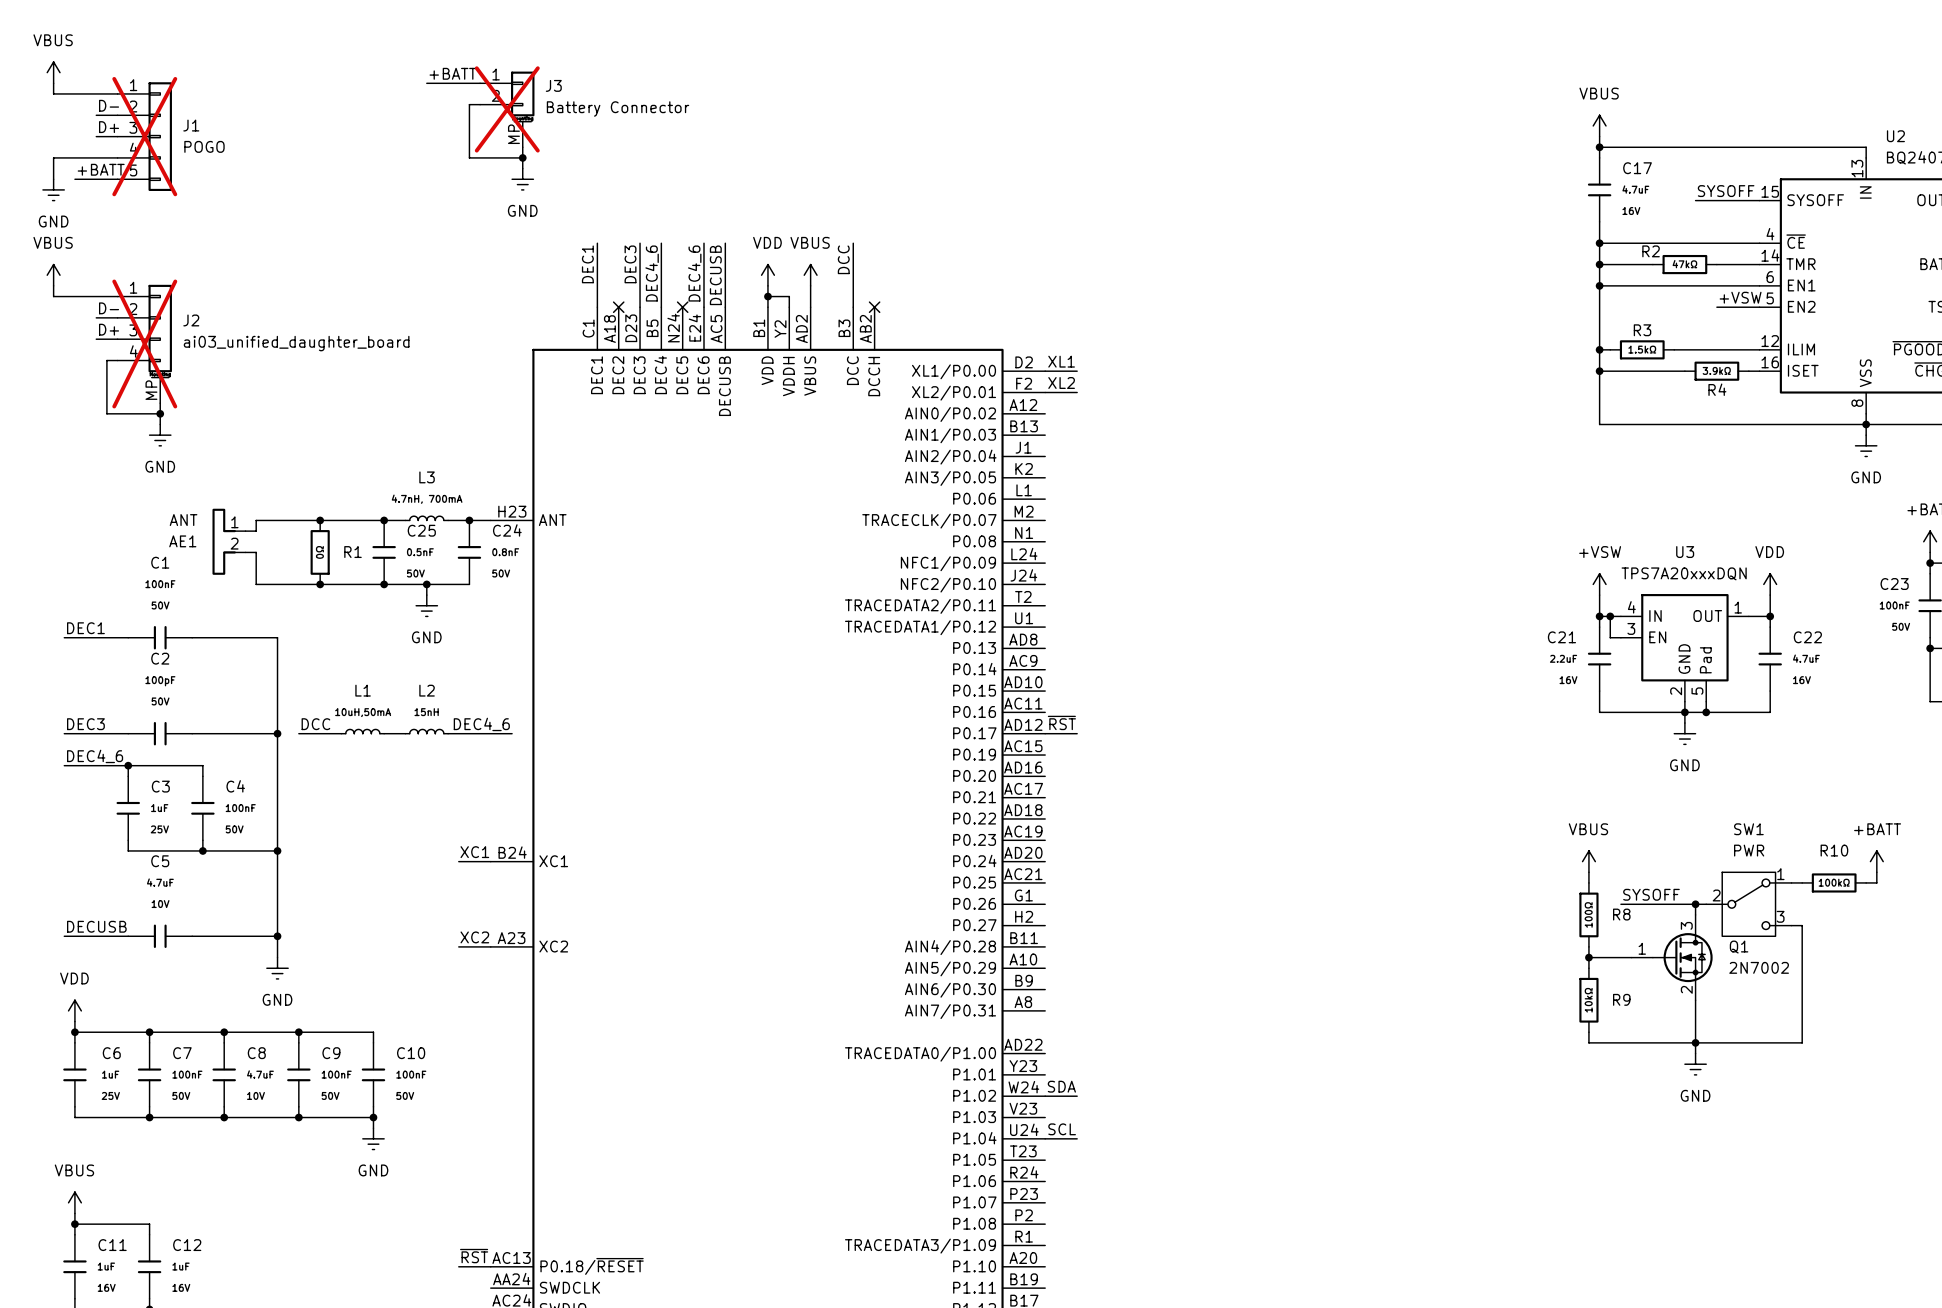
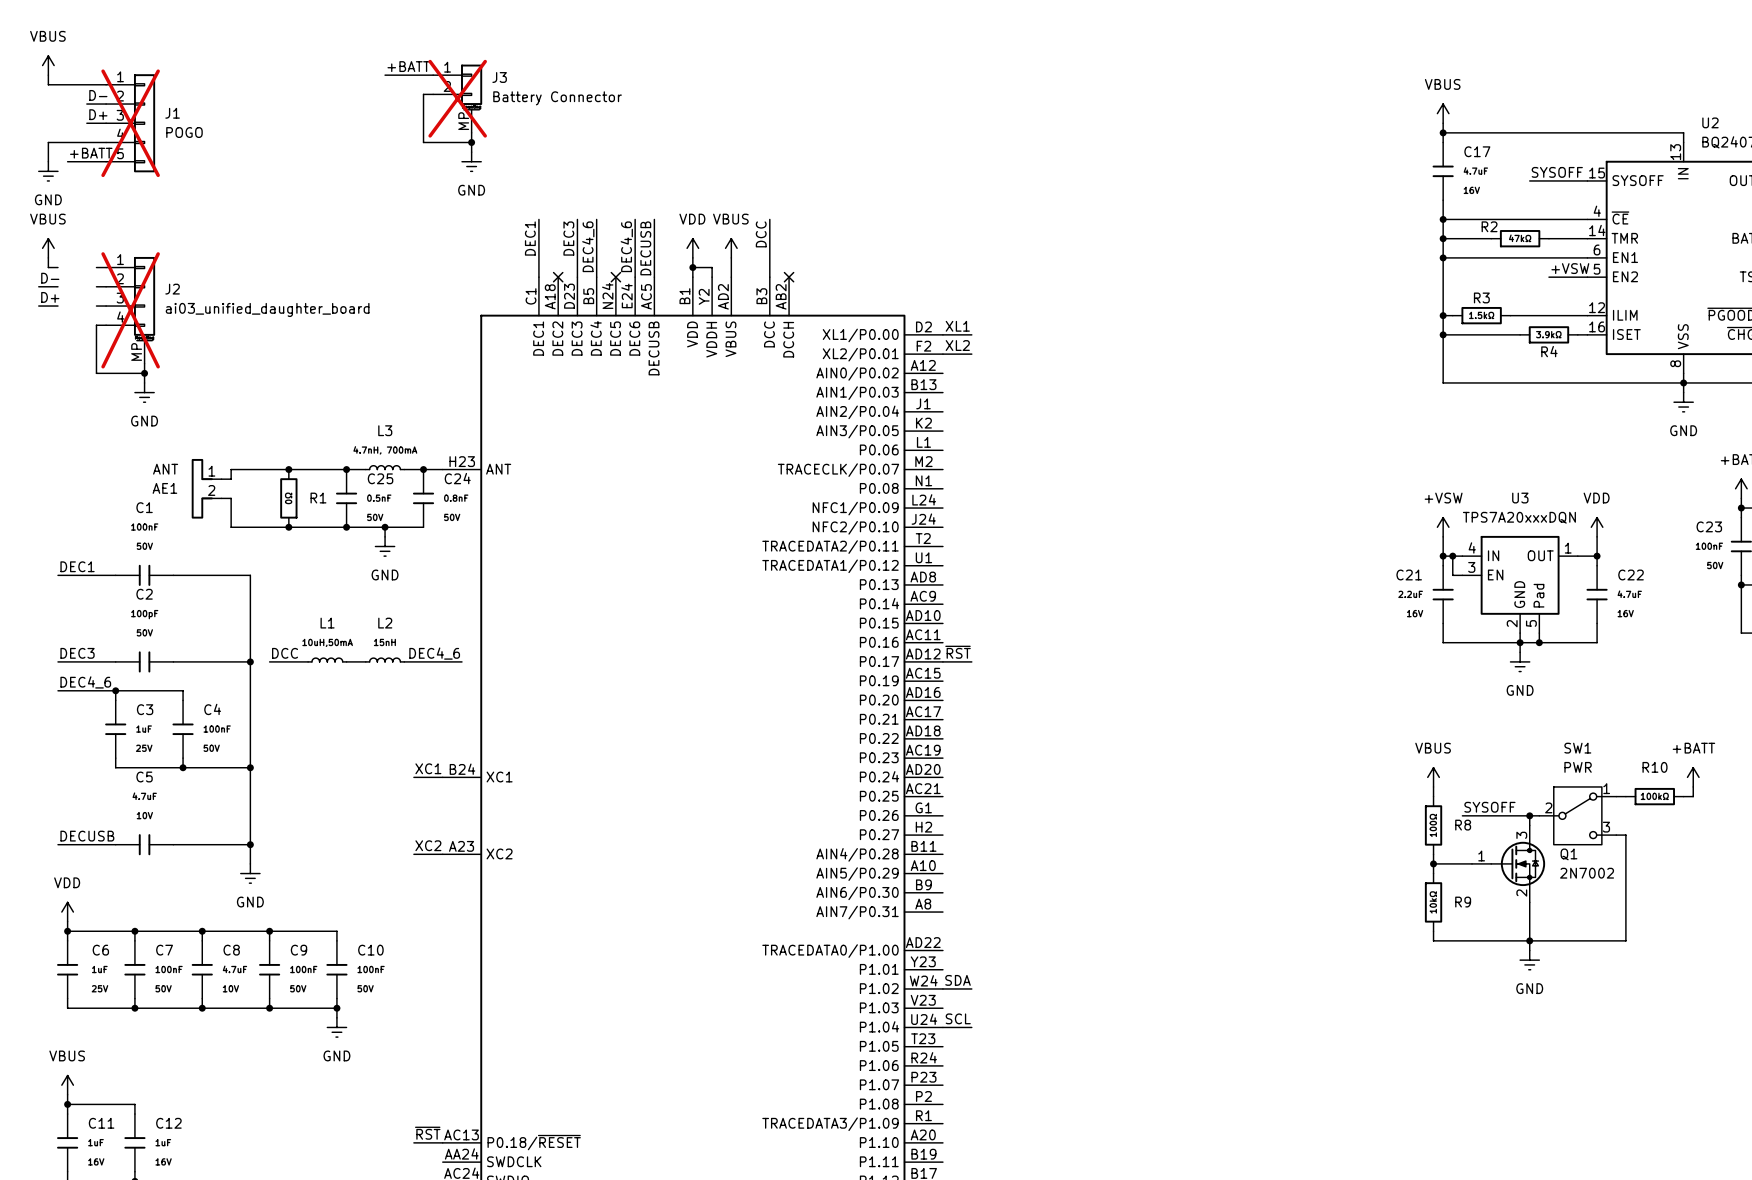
wire: (64, 296) (106, 296) -> none
label position: D- (109, 308) -> D- (50, 278)
wire: none -> (38, 286) (57, 286)
wire: (96, 317) (106, 317) -> none
label position: D+ (109, 329) -> D+ (50, 297)
wire: none -> (38, 306) (57, 306)
wire: (96, 339) (106, 339) -> none

